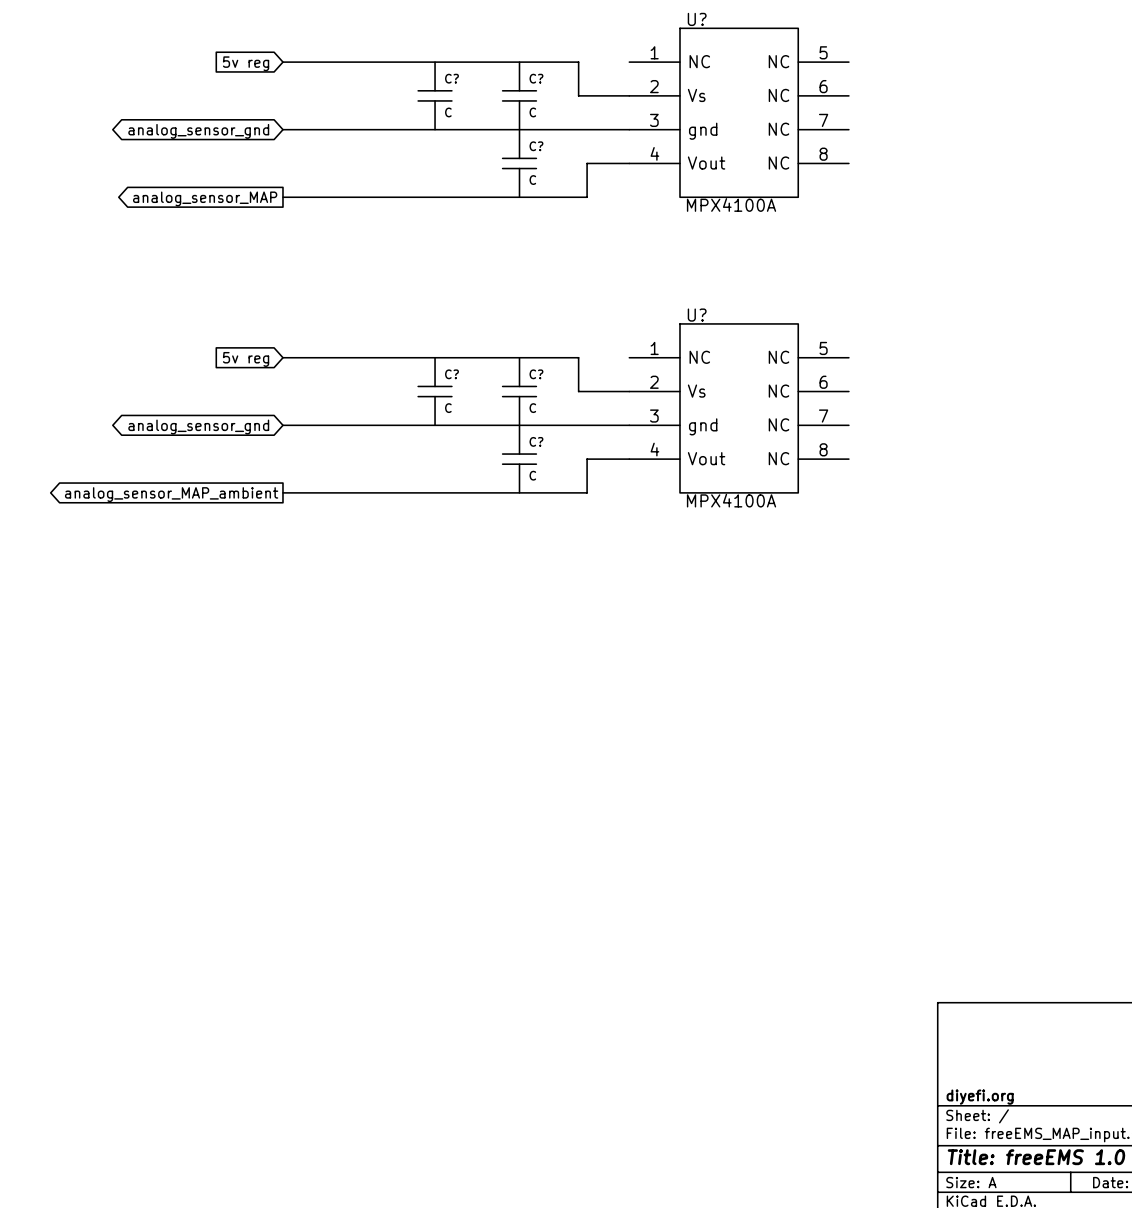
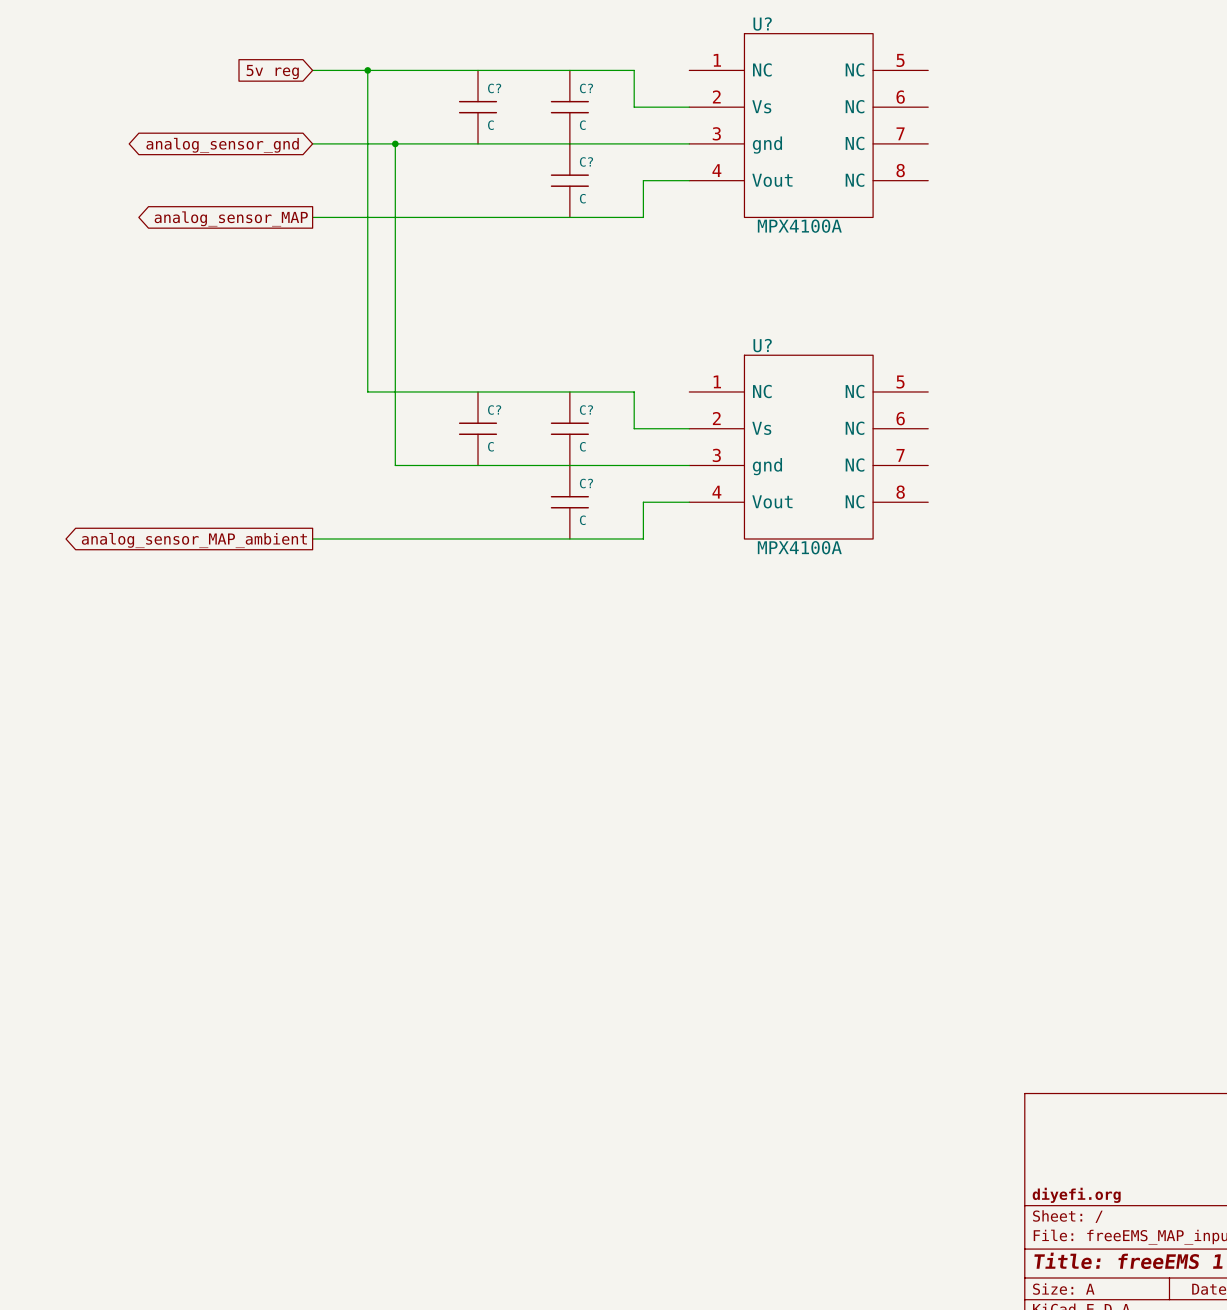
junction: none -> (367, 70)
junction: none -> (395, 143)
wire: (282, 357) (333, 357) -> (367, 70) (367, 391)
global label: 5v reg (246, 359) -> none
wire: (282, 425) (359, 425) -> (395, 143) (395, 465)
global label: analog_sensor_gnd (198, 427) -> none

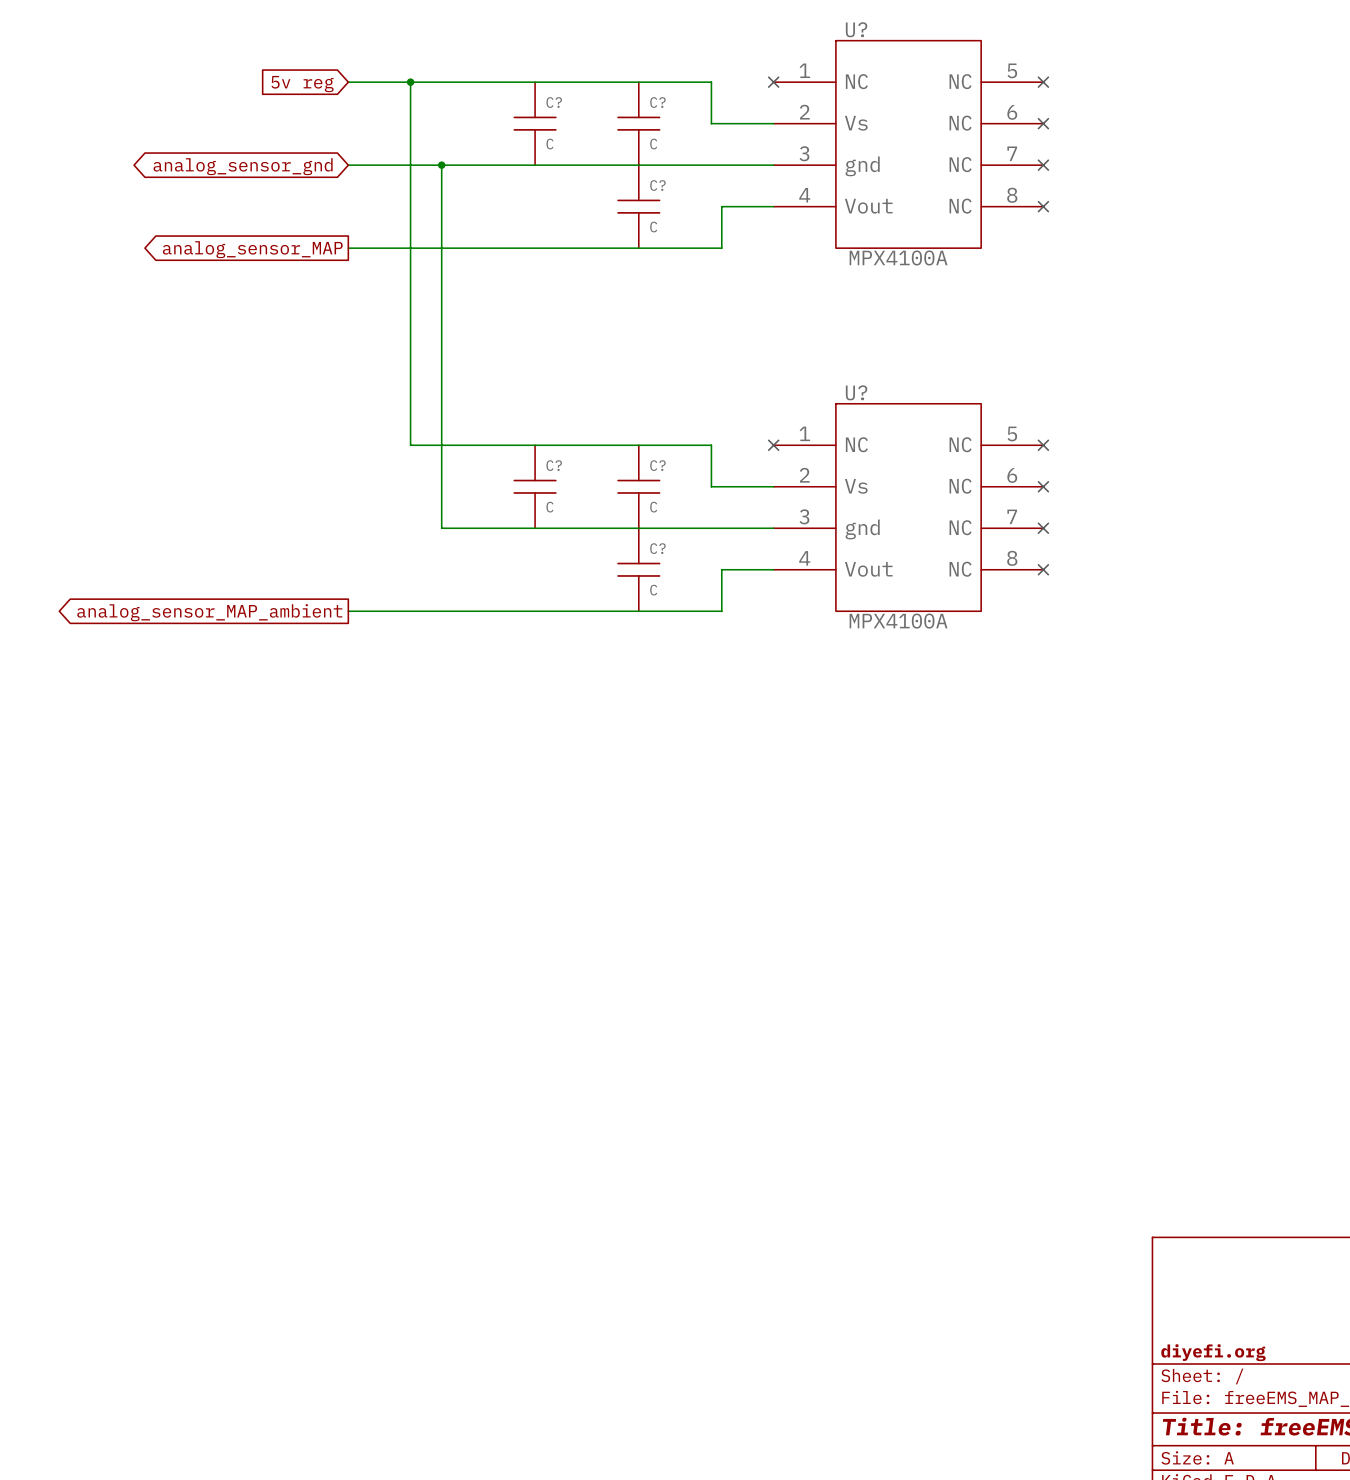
no-connect mark: none -> (773, 82)
no-connect mark: none -> (1043, 82)
no-connect mark: none -> (1043, 123)
no-connect mark: none -> (1043, 165)
no-connect mark: none -> (1043, 206)
no-connect mark: none -> (773, 445)
no-connect mark: none -> (1043, 445)
no-connect mark: none -> (1043, 486)
no-connect mark: none -> (1043, 528)
no-connect mark: none -> (1043, 569)

